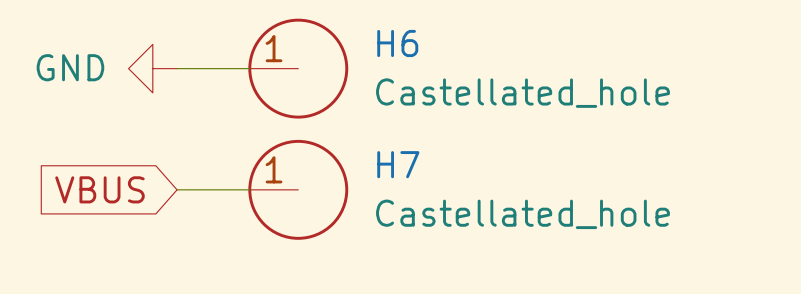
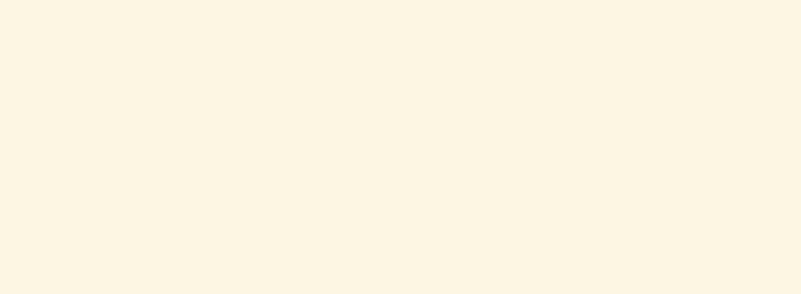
power symbol: GND (152, 68) -> none
wire: (177, 68) (249, 68) -> none
H6: Castellated_hole (298, 68) -> none
global label: VBUS (99, 189) -> none
wire: (177, 189) (249, 189) -> none
H7: Castellated_hole (298, 189) -> none

